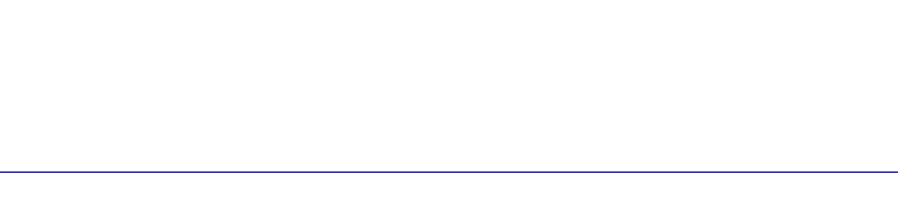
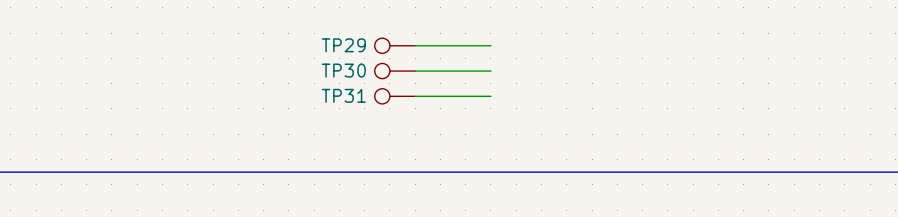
TP29: none -> (394, 45)
wire: none -> (415, 45) (490, 45)
TP30: none -> (394, 71)
wire: none -> (415, 71) (490, 71)
TP31: none -> (394, 96)
wire: none -> (415, 96) (490, 96)

